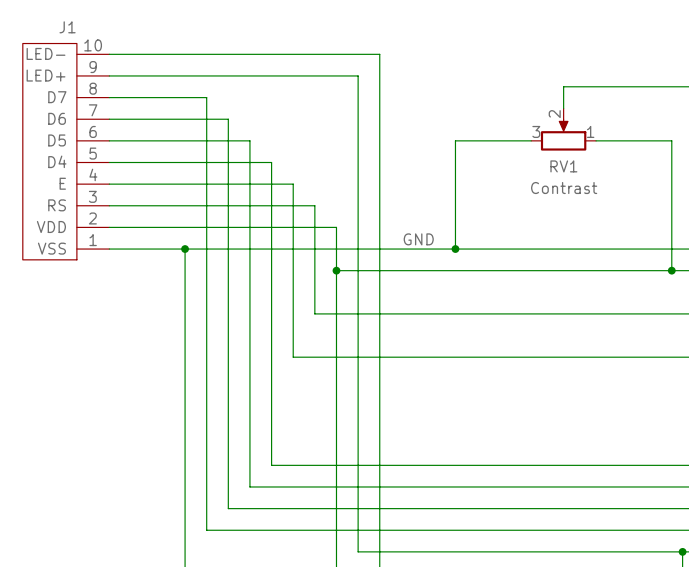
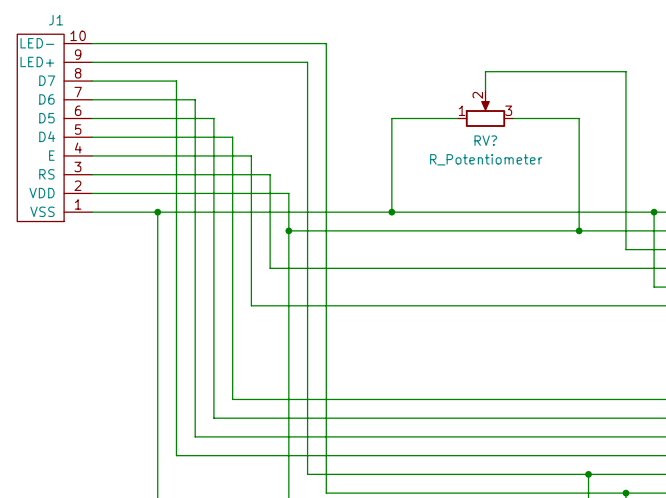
RV1 flip: as is (563, 134) -> left-right (485, 113)
RV1 name: RV1 (563, 166) -> RV? (485, 140)
RV1 value: Contrast (564, 188) -> R_Potentiometer (486, 159)
label: GND (418, 239) -> none

